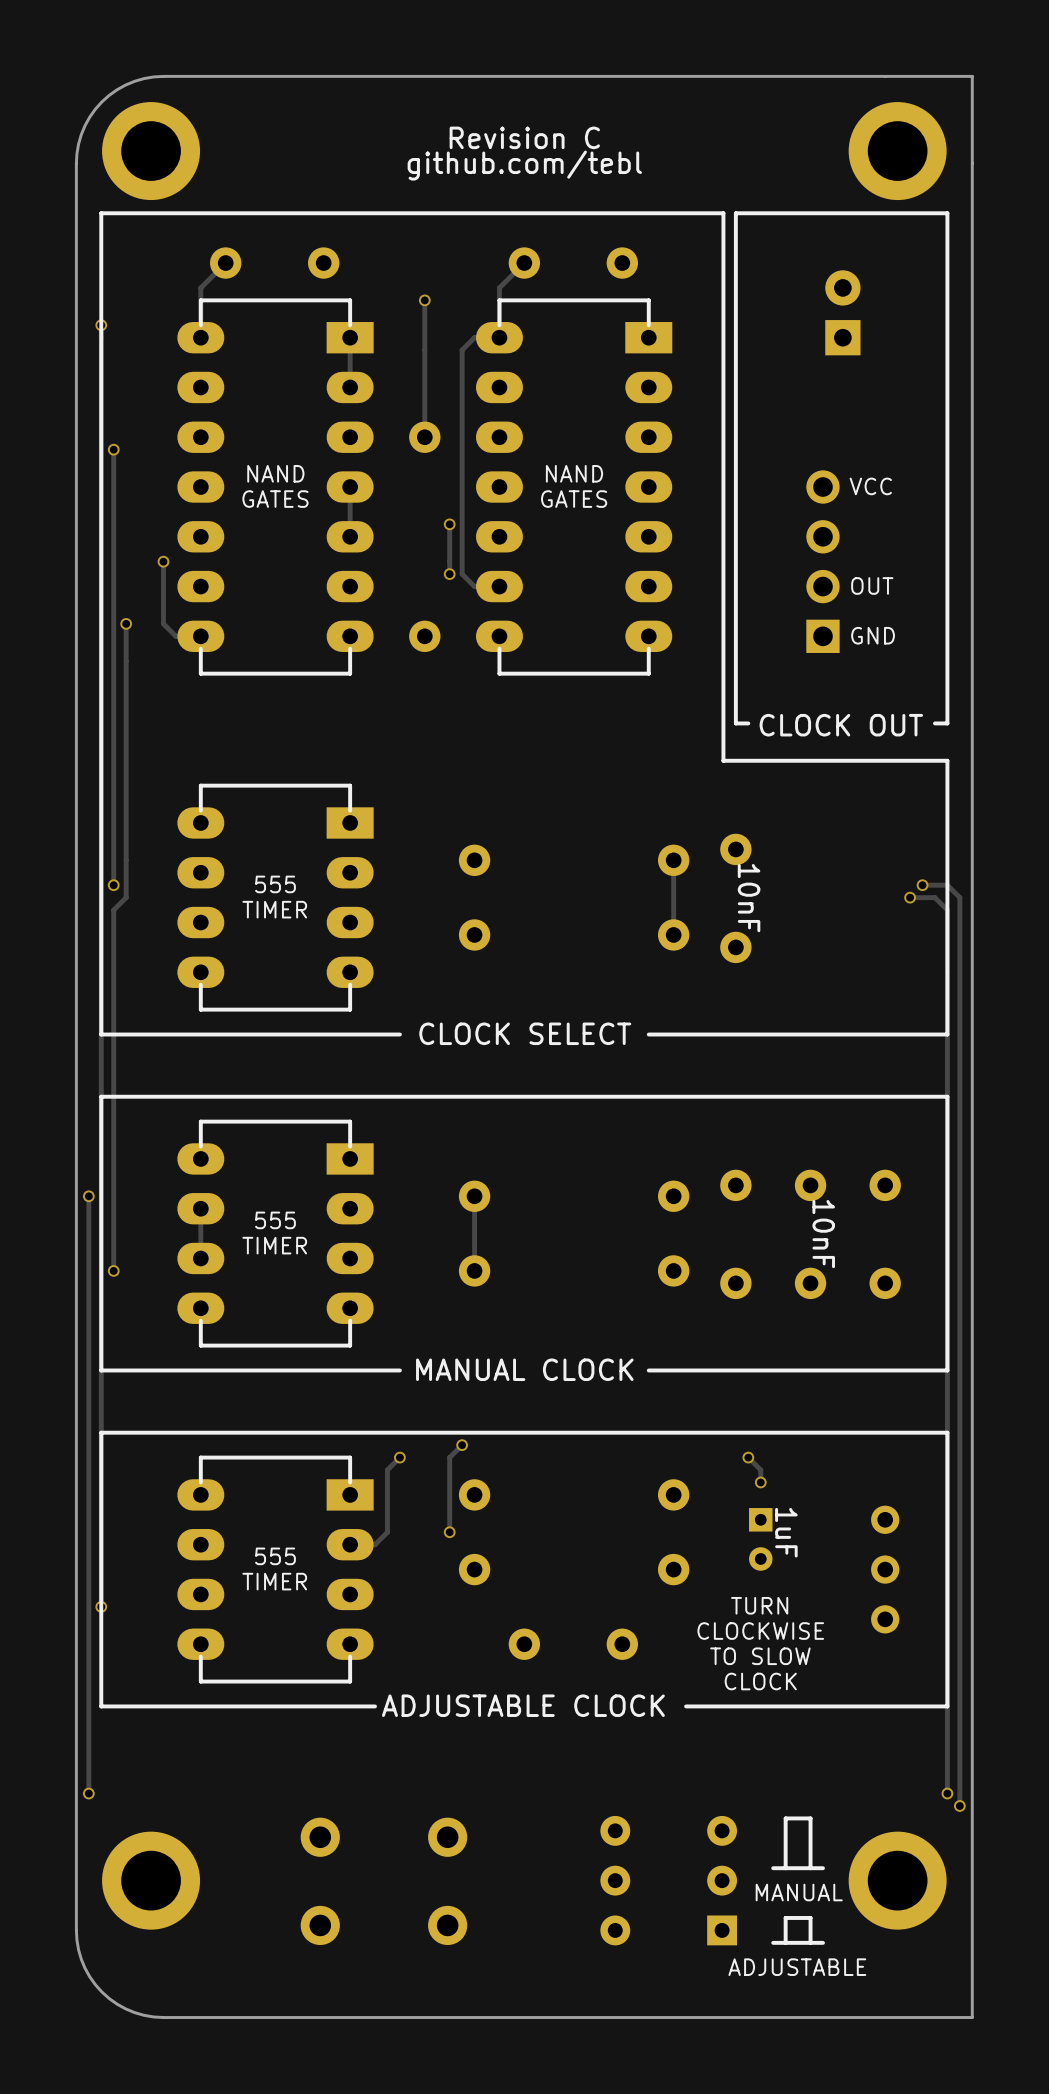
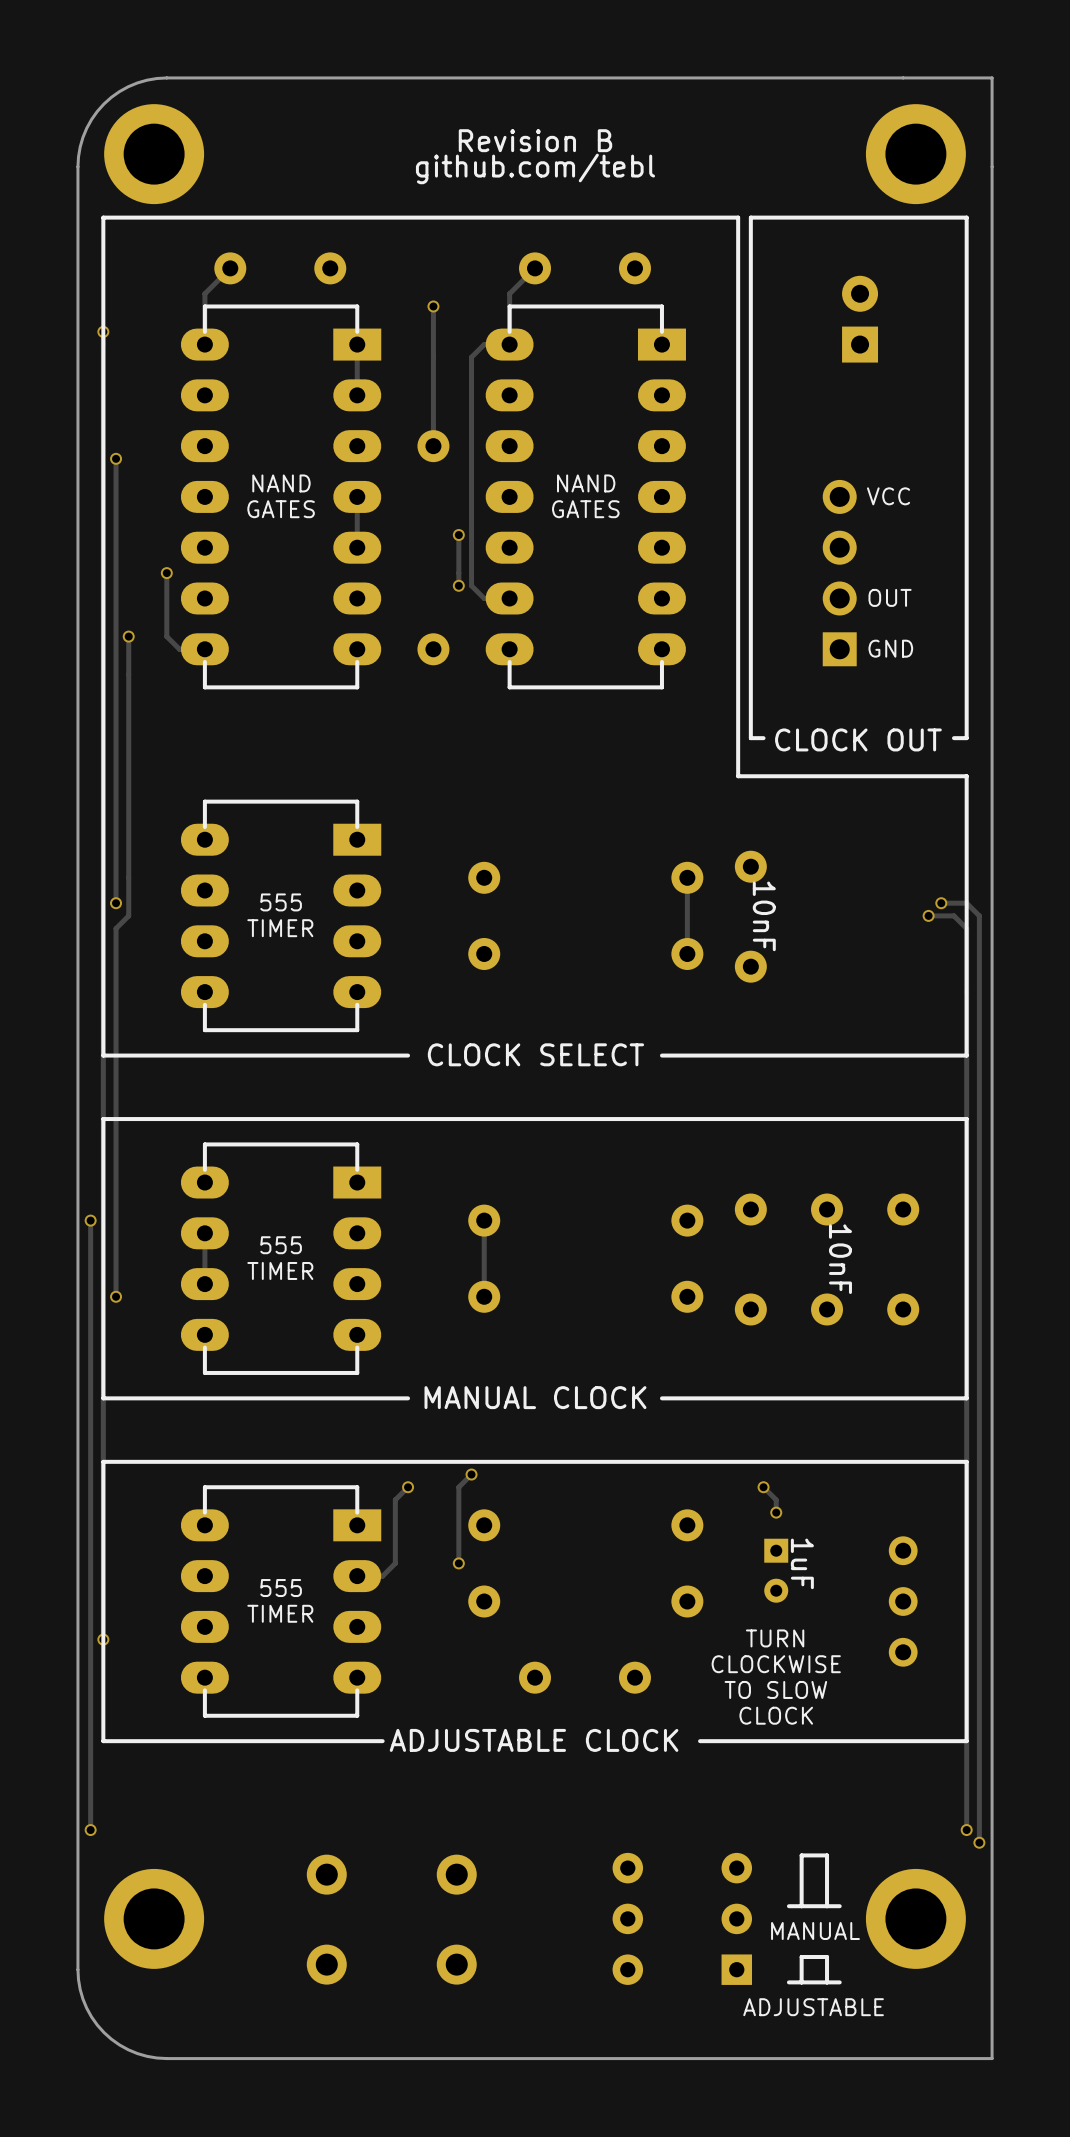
text: Revision C (524, 137) -> Revision B (535, 140)

